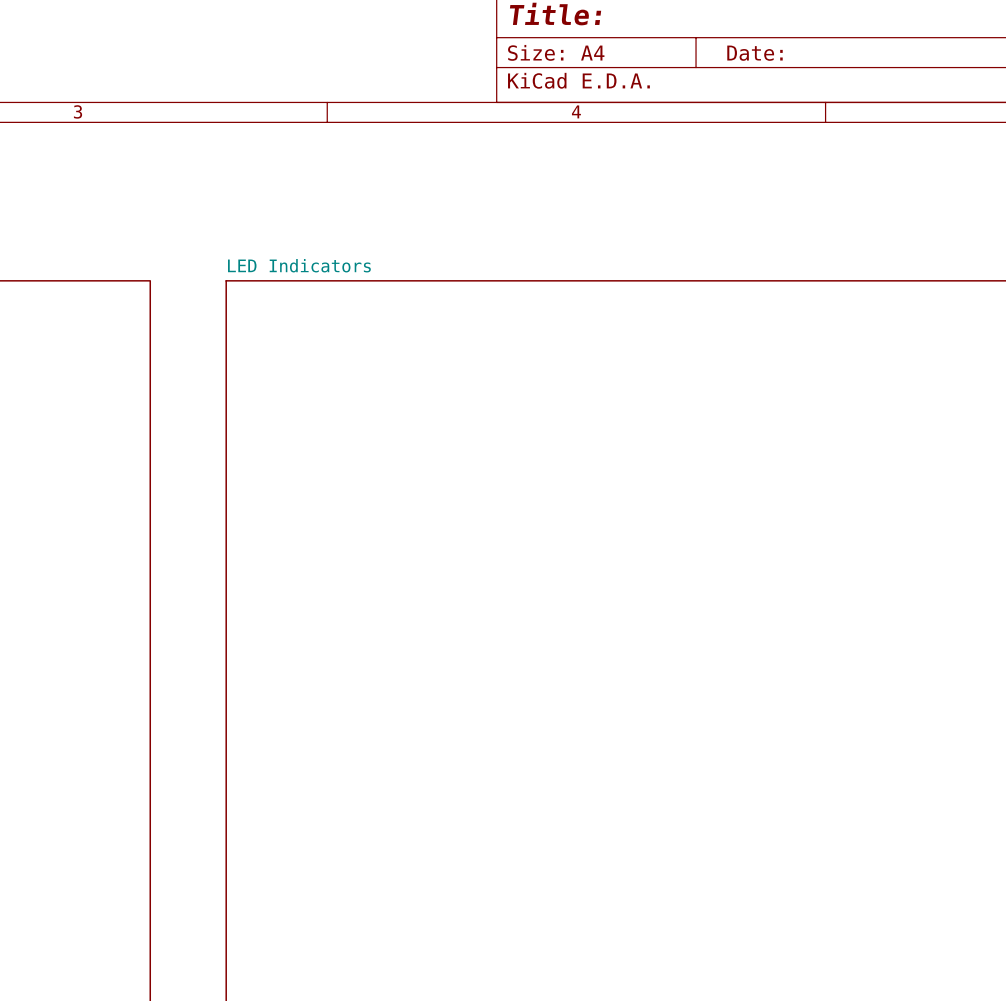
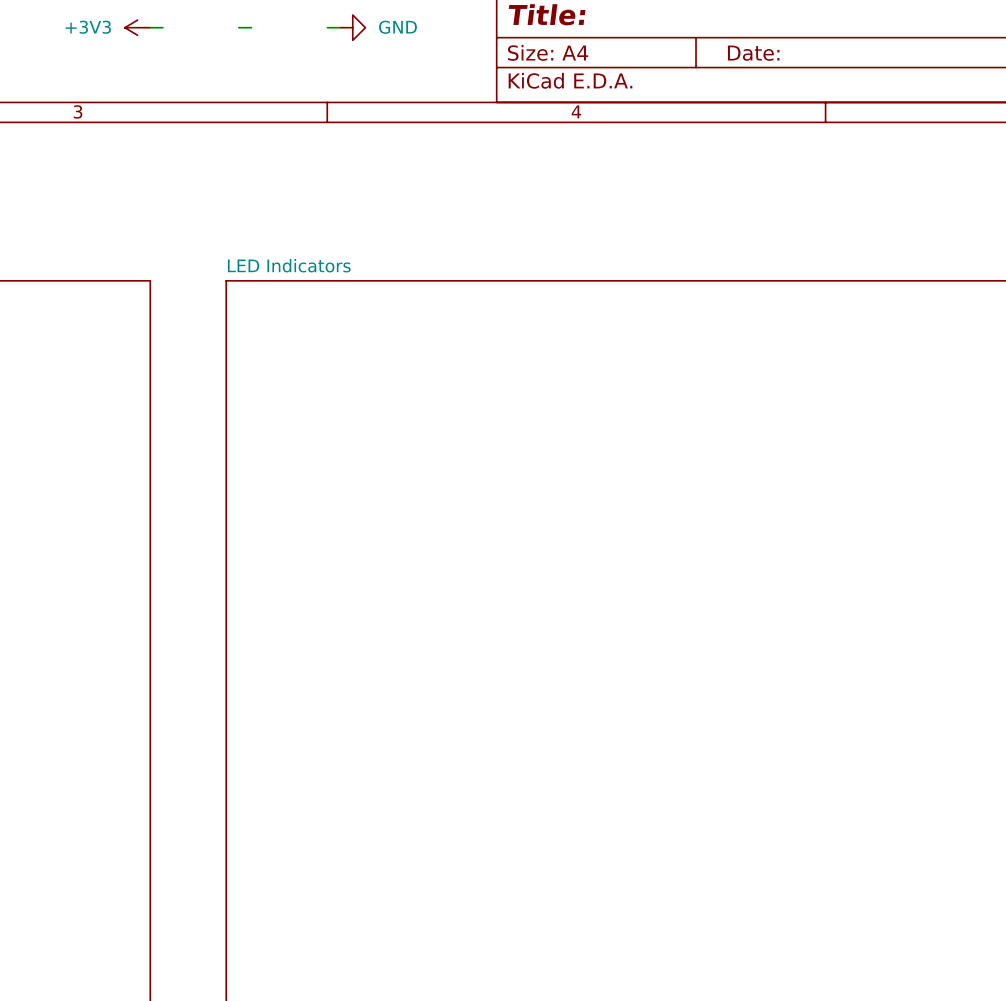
power symbol: none -> +3V3 (137, 27)
wire: none -> (150, 27) (162, 27)
wire: none -> (238, 27) (251, 27)
wire: none -> (327, 27) (340, 27)
power symbol: none -> GND (352, 27)

